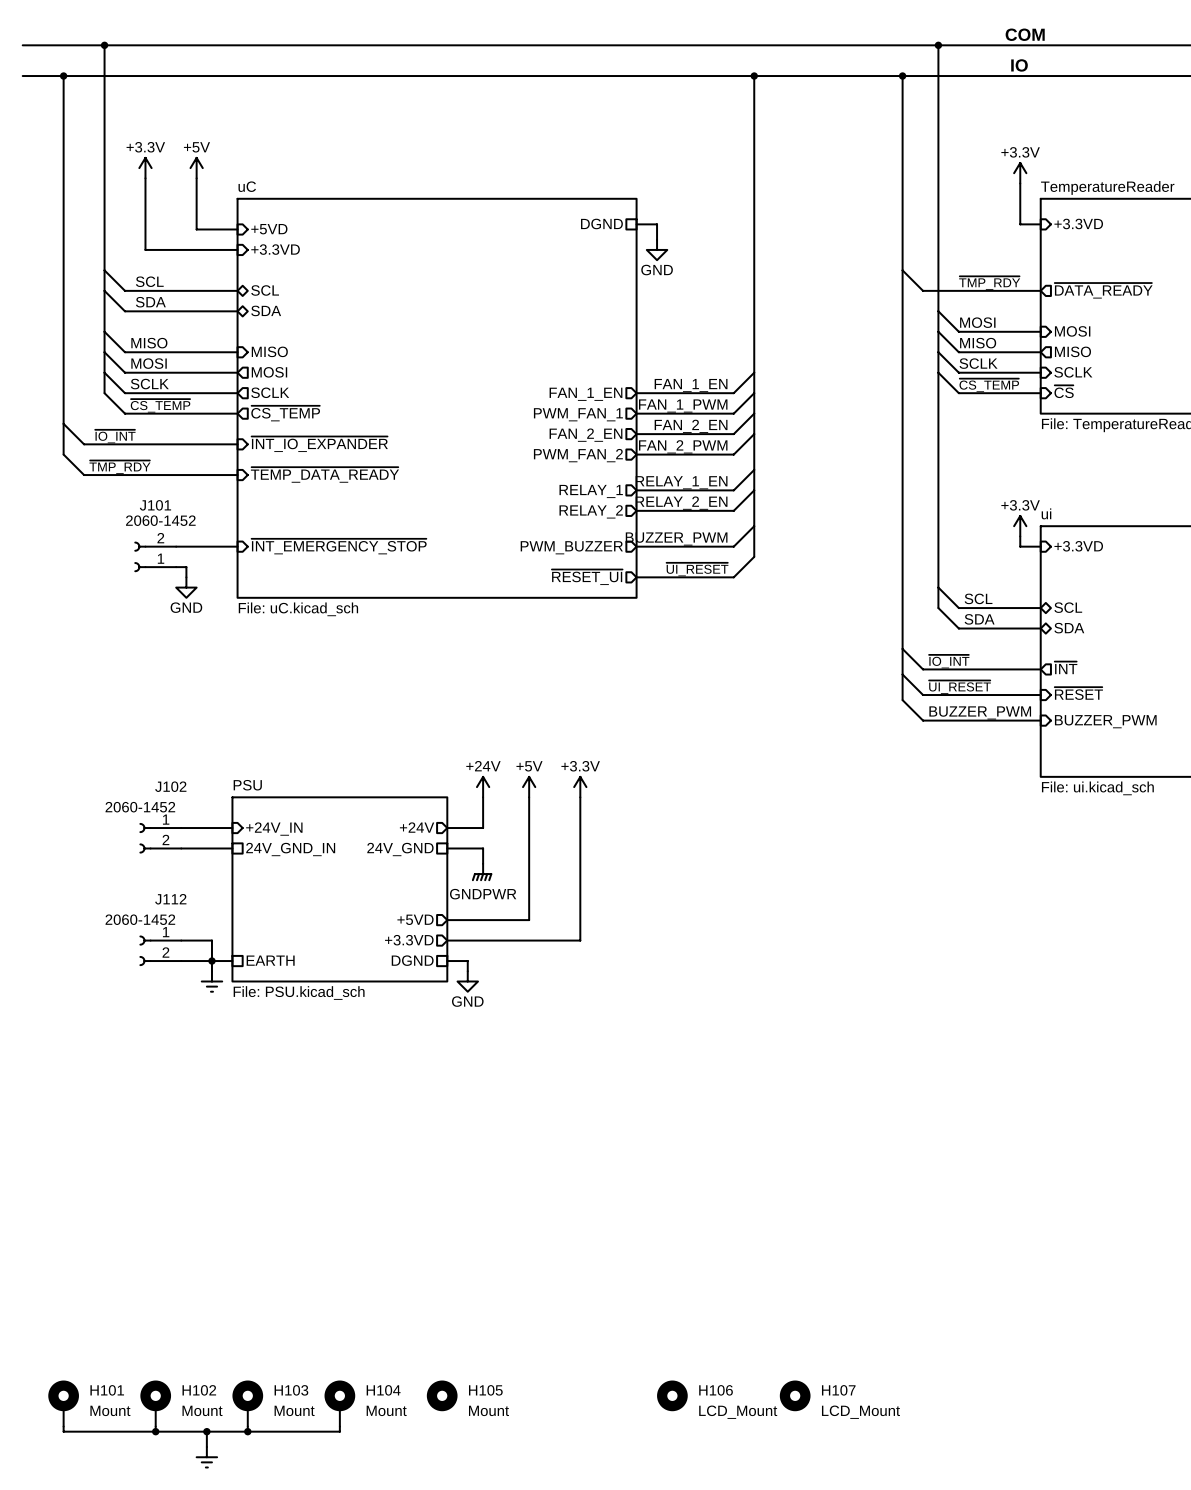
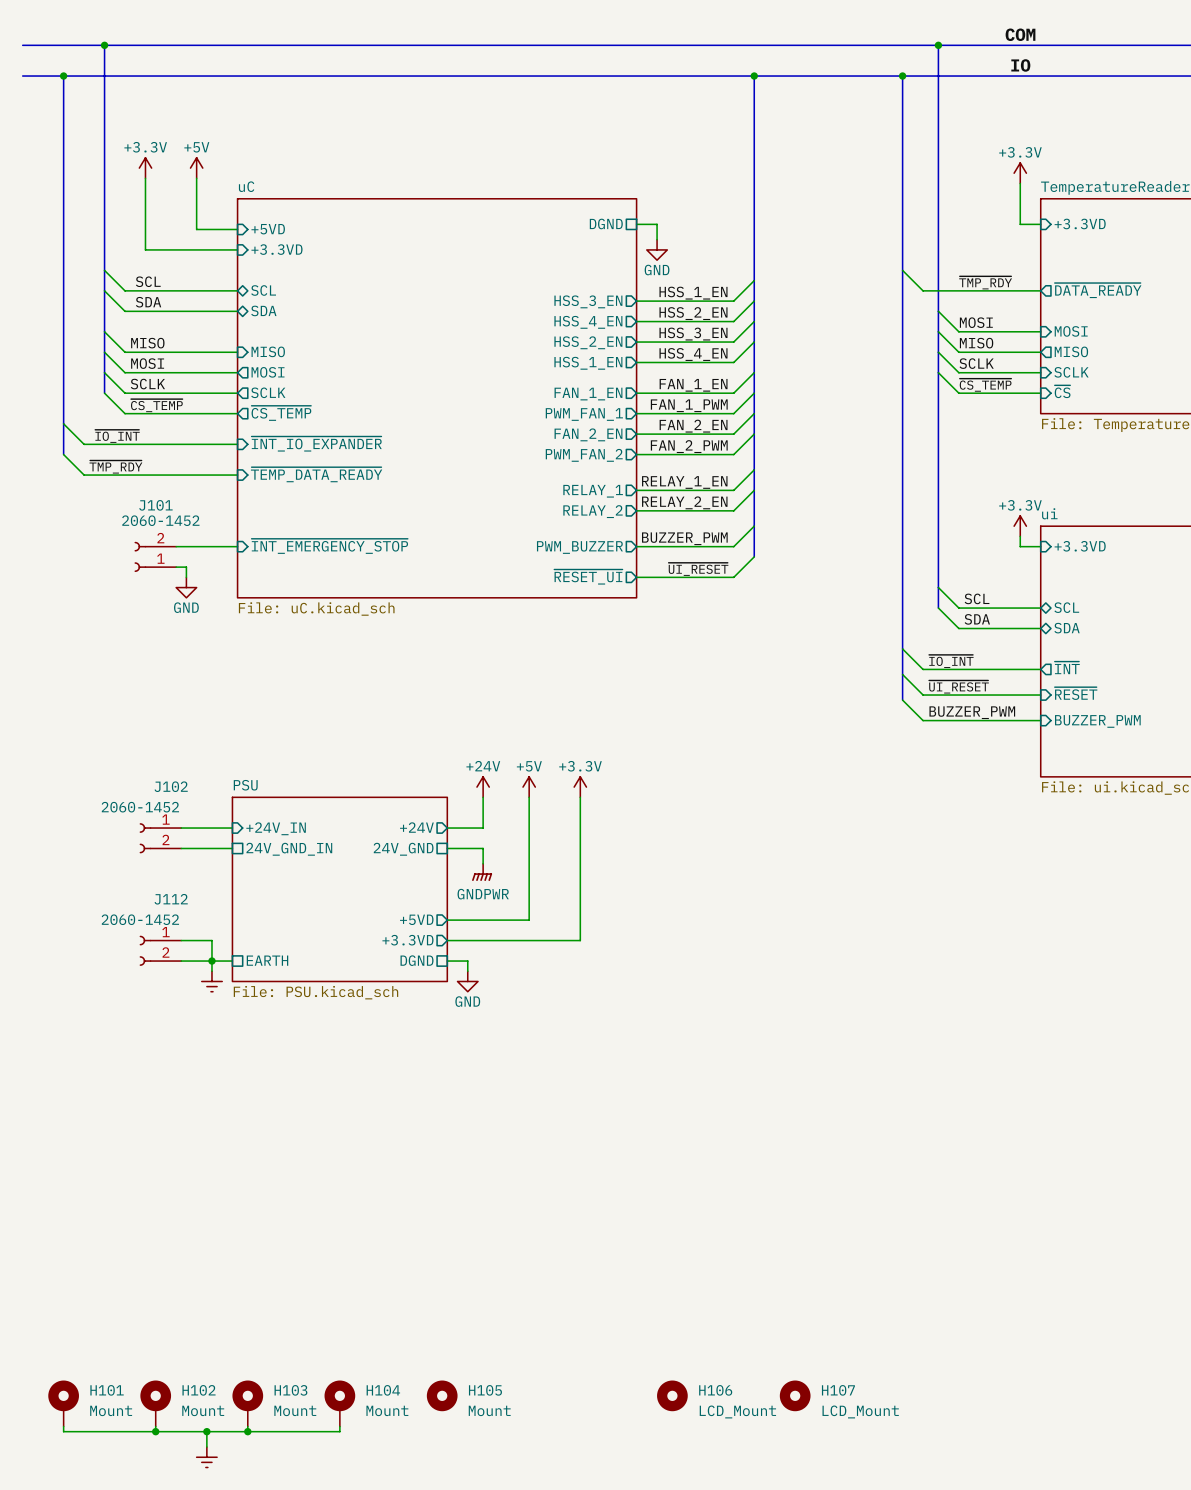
wire: none -> (754, 280) (733, 301) (636, 301)
label: none -> HSS_1_EN (693, 293)
wire: none -> (754, 301) (733, 321) (636, 321)
sheet pin: none -> HSS_3_EN (588, 301)
label: none -> HSS_2_EN (693, 313)
wire: none -> (754, 321) (733, 342) (636, 342)
sheet pin: none -> HSS_4_EN (588, 322)
label: none -> HSS_3_EN (693, 334)
wire: none -> (754, 342) (733, 362) (636, 362)
sheet pin: none -> HSS_2_EN (588, 342)
label: none -> HSS_4_EN (693, 354)
sheet pin: none -> HSS_1_EN (588, 363)

